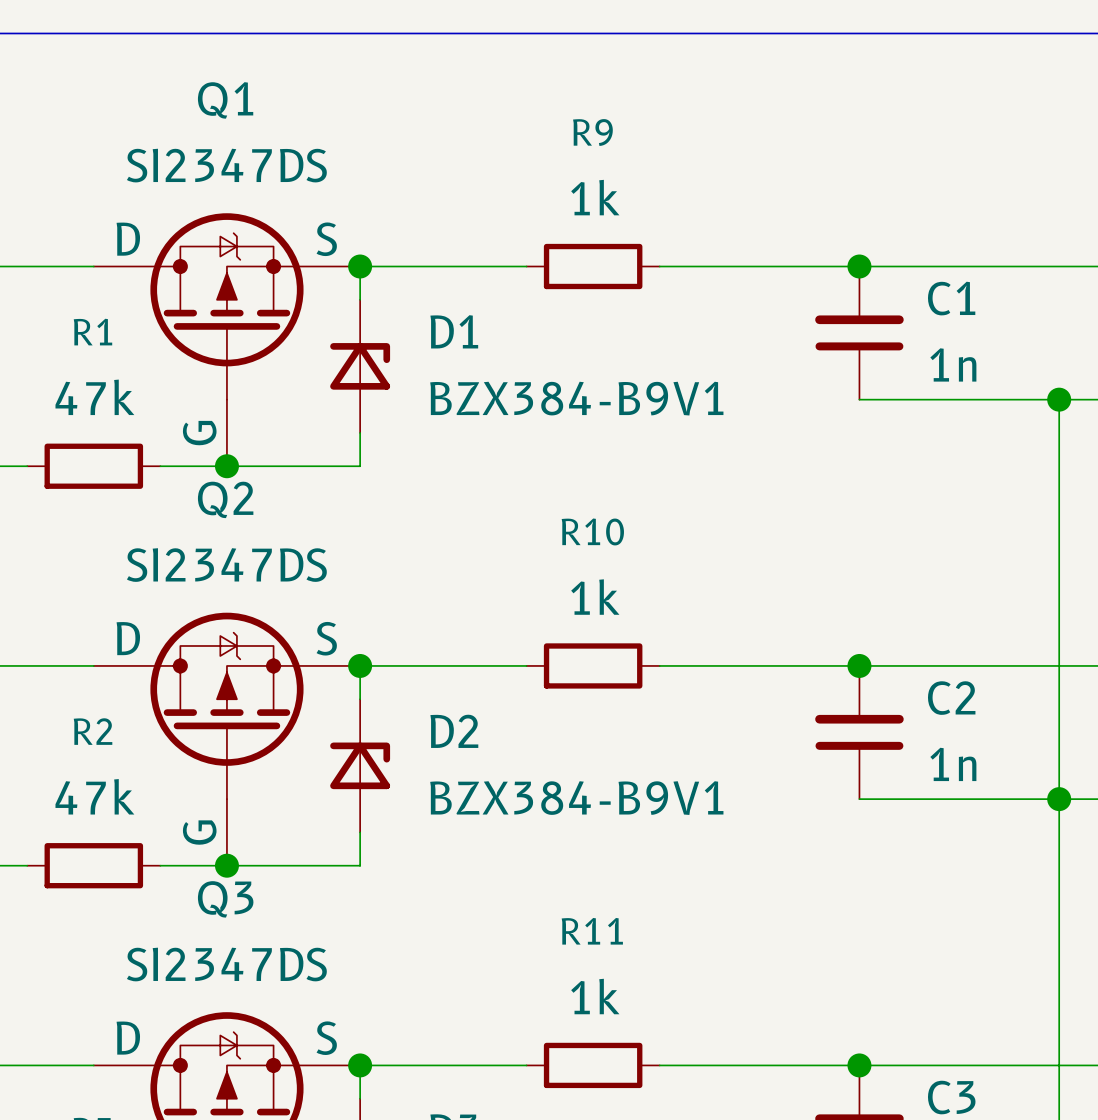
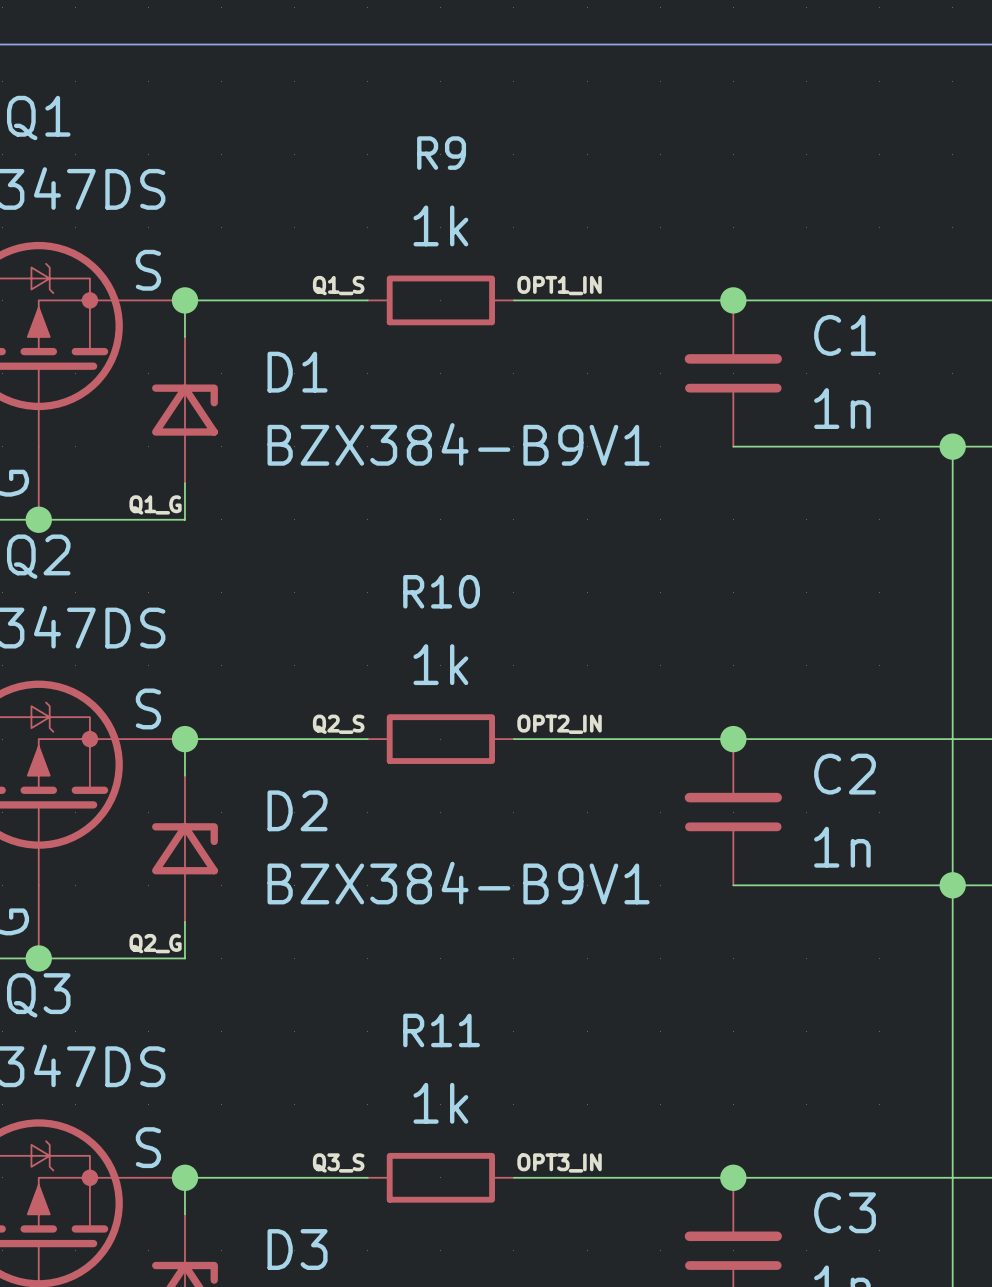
label: none -> Q1_S (338, 285)
label: none -> OPT1_IN (559, 285)
label: none -> Q1_G (155, 504)
label: none -> Q2_S (338, 724)
label: none -> OPT2_IN (559, 724)
label: none -> Q2_G (155, 943)
label: none -> Q3_S (338, 1162)
label: none -> OPT3_IN (559, 1162)

